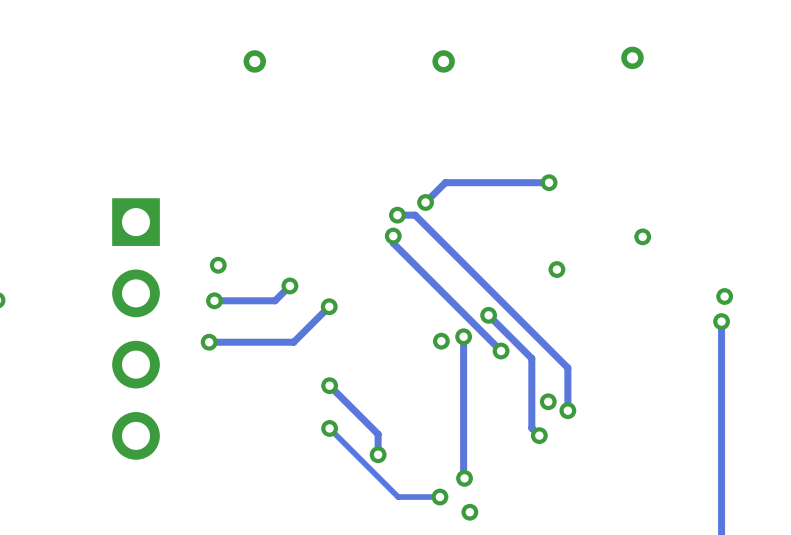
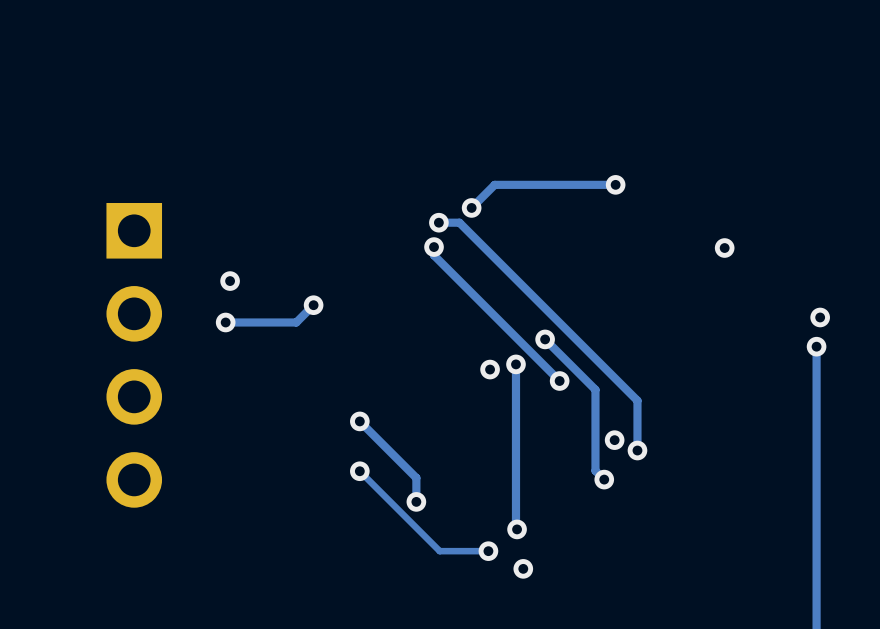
via: (632, 57) -> none
via: (254, 61) -> none
via: (443, 61) -> none
via: (556, 269) -> none
track: (329, 306) (293, 342) (209, 342) -> none
via: (329, 306) -> none
via: (209, 342) -> none

